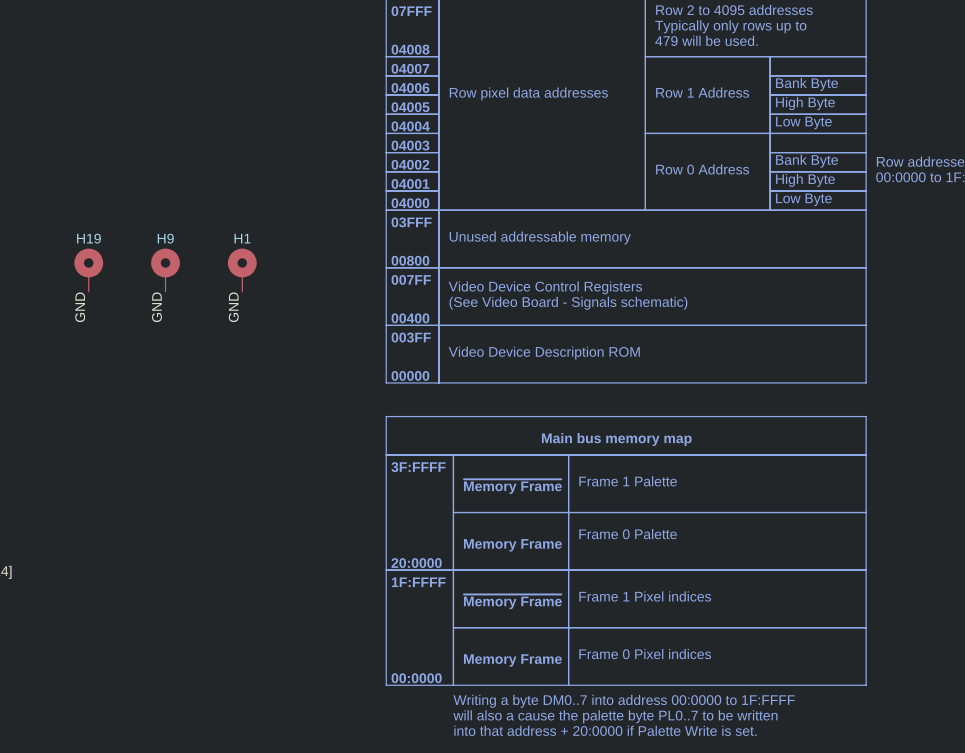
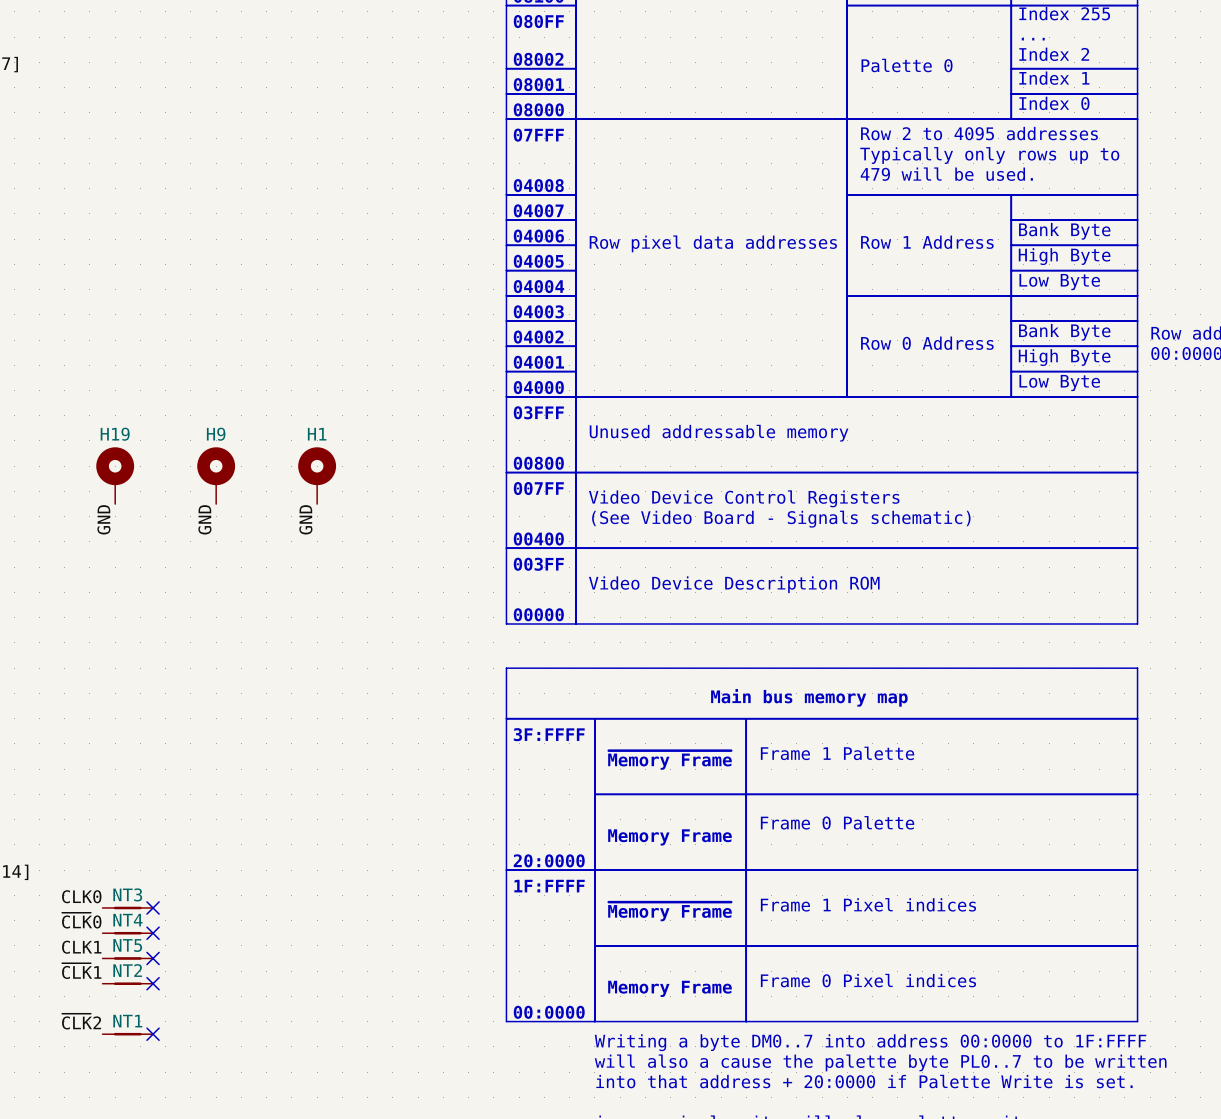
label: none -> CLK0 (81, 896)
NT3: none -> (127, 907)
no-connect mark: none -> (153, 907)
label: none -> ~{CLK}0 (81, 920)
NT4: none -> (127, 933)
no-connect mark: none -> (153, 933)
label: none -> CLK1 (81, 947)
NT5: none -> (127, 958)
no-connect mark: none -> (153, 958)
label: none -> ~{CLK}1 (81, 971)
NT2: none -> (127, 983)
no-connect mark: none -> (153, 983)
label: none -> ~{CLK}2 (81, 1021)
NT1: none -> (127, 1034)
no-connect mark: none -> (153, 1034)

